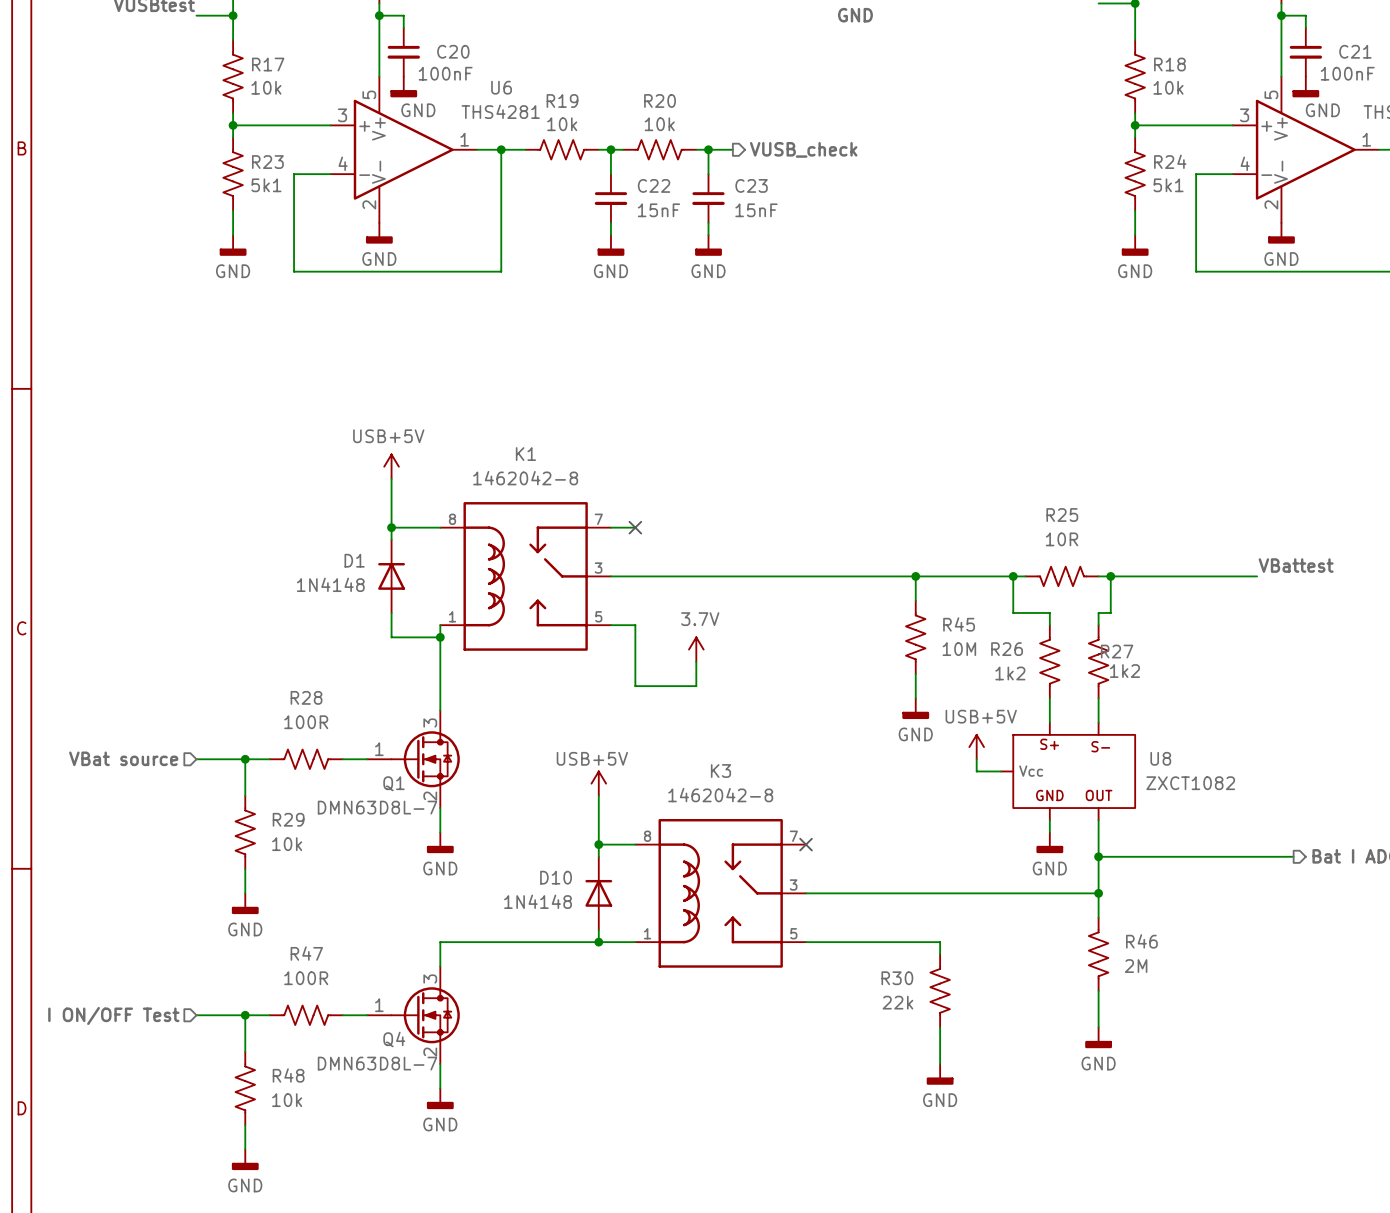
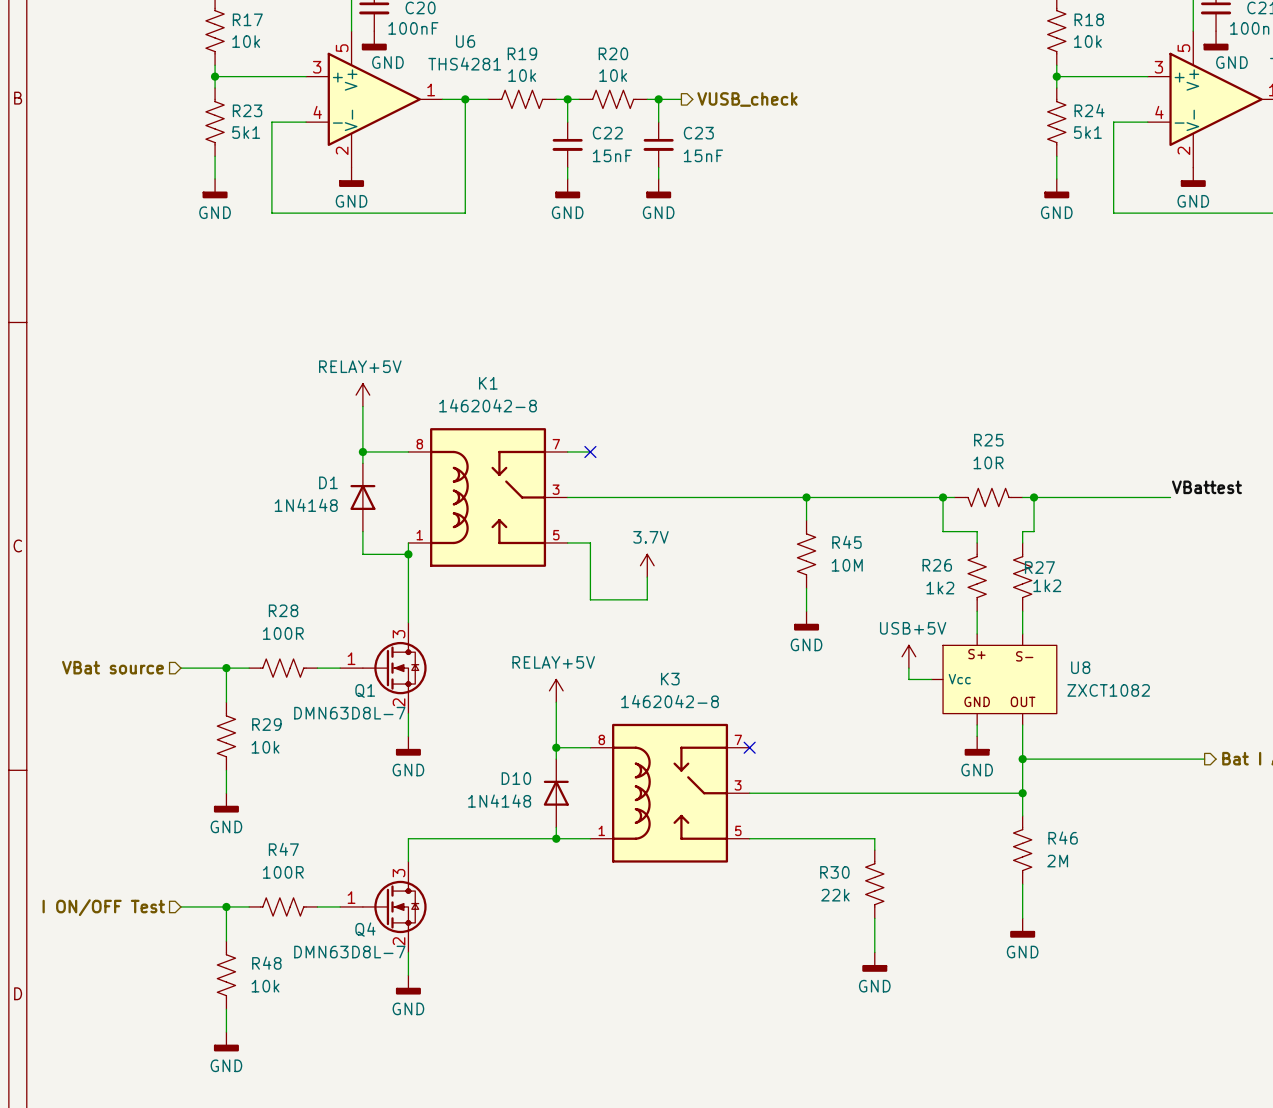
power symbol: USB+5V (391, 466) -> RELAY+5V (362, 395)
wire: (915, 576) (915, 600) -> (806, 497) (806, 520)
junction position: (915, 576) -> (806, 497)
R45 position: (915, 637) -> (806, 554)
wire: (915, 673) (915, 698) -> (806, 588) (806, 611)
power symbol position: GND (915, 708) -> GND (806, 620)
power symbol: USB+5V (598, 783) -> RELAY+5V (556, 690)

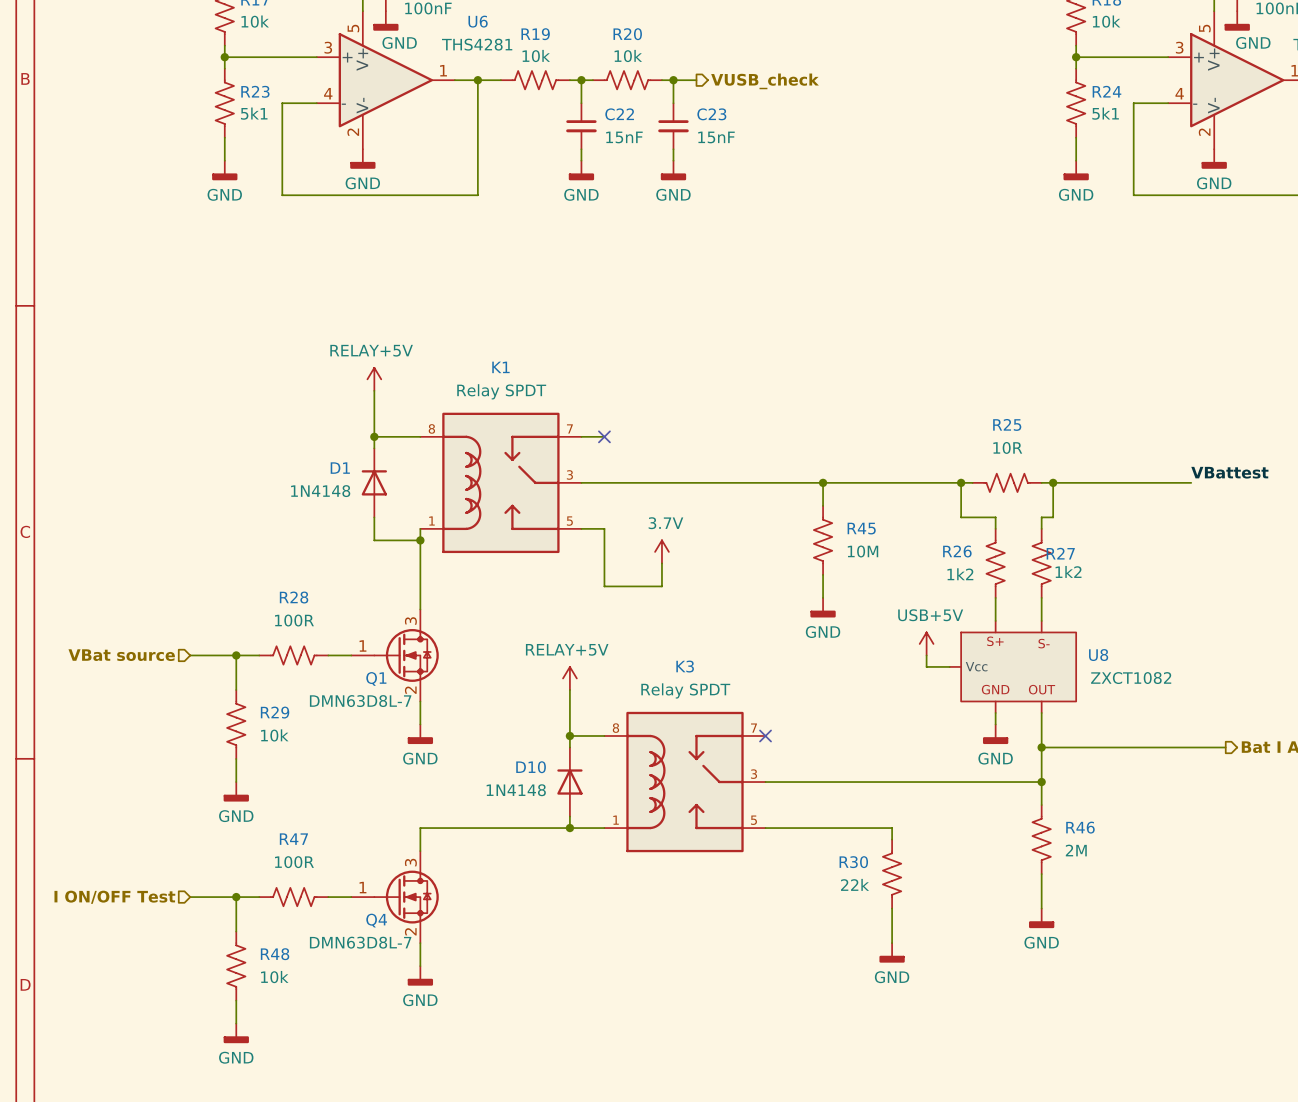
K1 value: 1462042-8 (488, 405) -> Relay SPDT (501, 391)
K3 value: 1462042-8 (670, 701) -> Relay SPDT (685, 690)

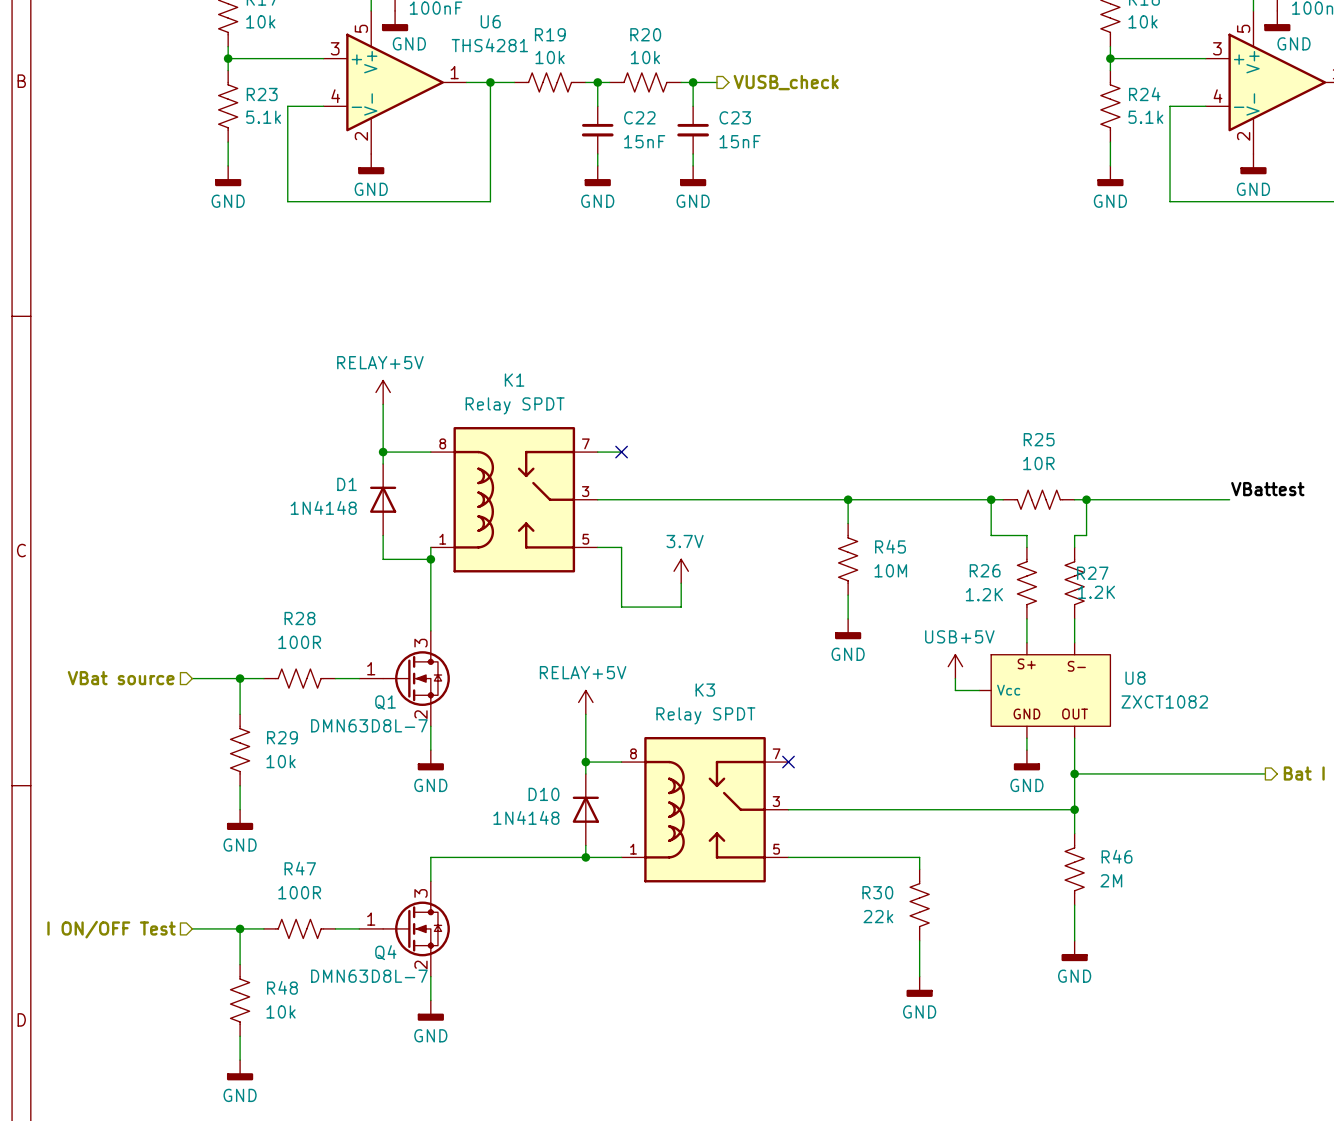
R23 value: 5k1 (254, 113) -> 5.1k (263, 117)
R24 value: 5k1 (1105, 113) -> 5.1k (1145, 117)
R27 value: 1k2 (1068, 571) -> 1.2K (1096, 592)
R26 value: 1k2 (960, 574) -> 1.2K (984, 594)

